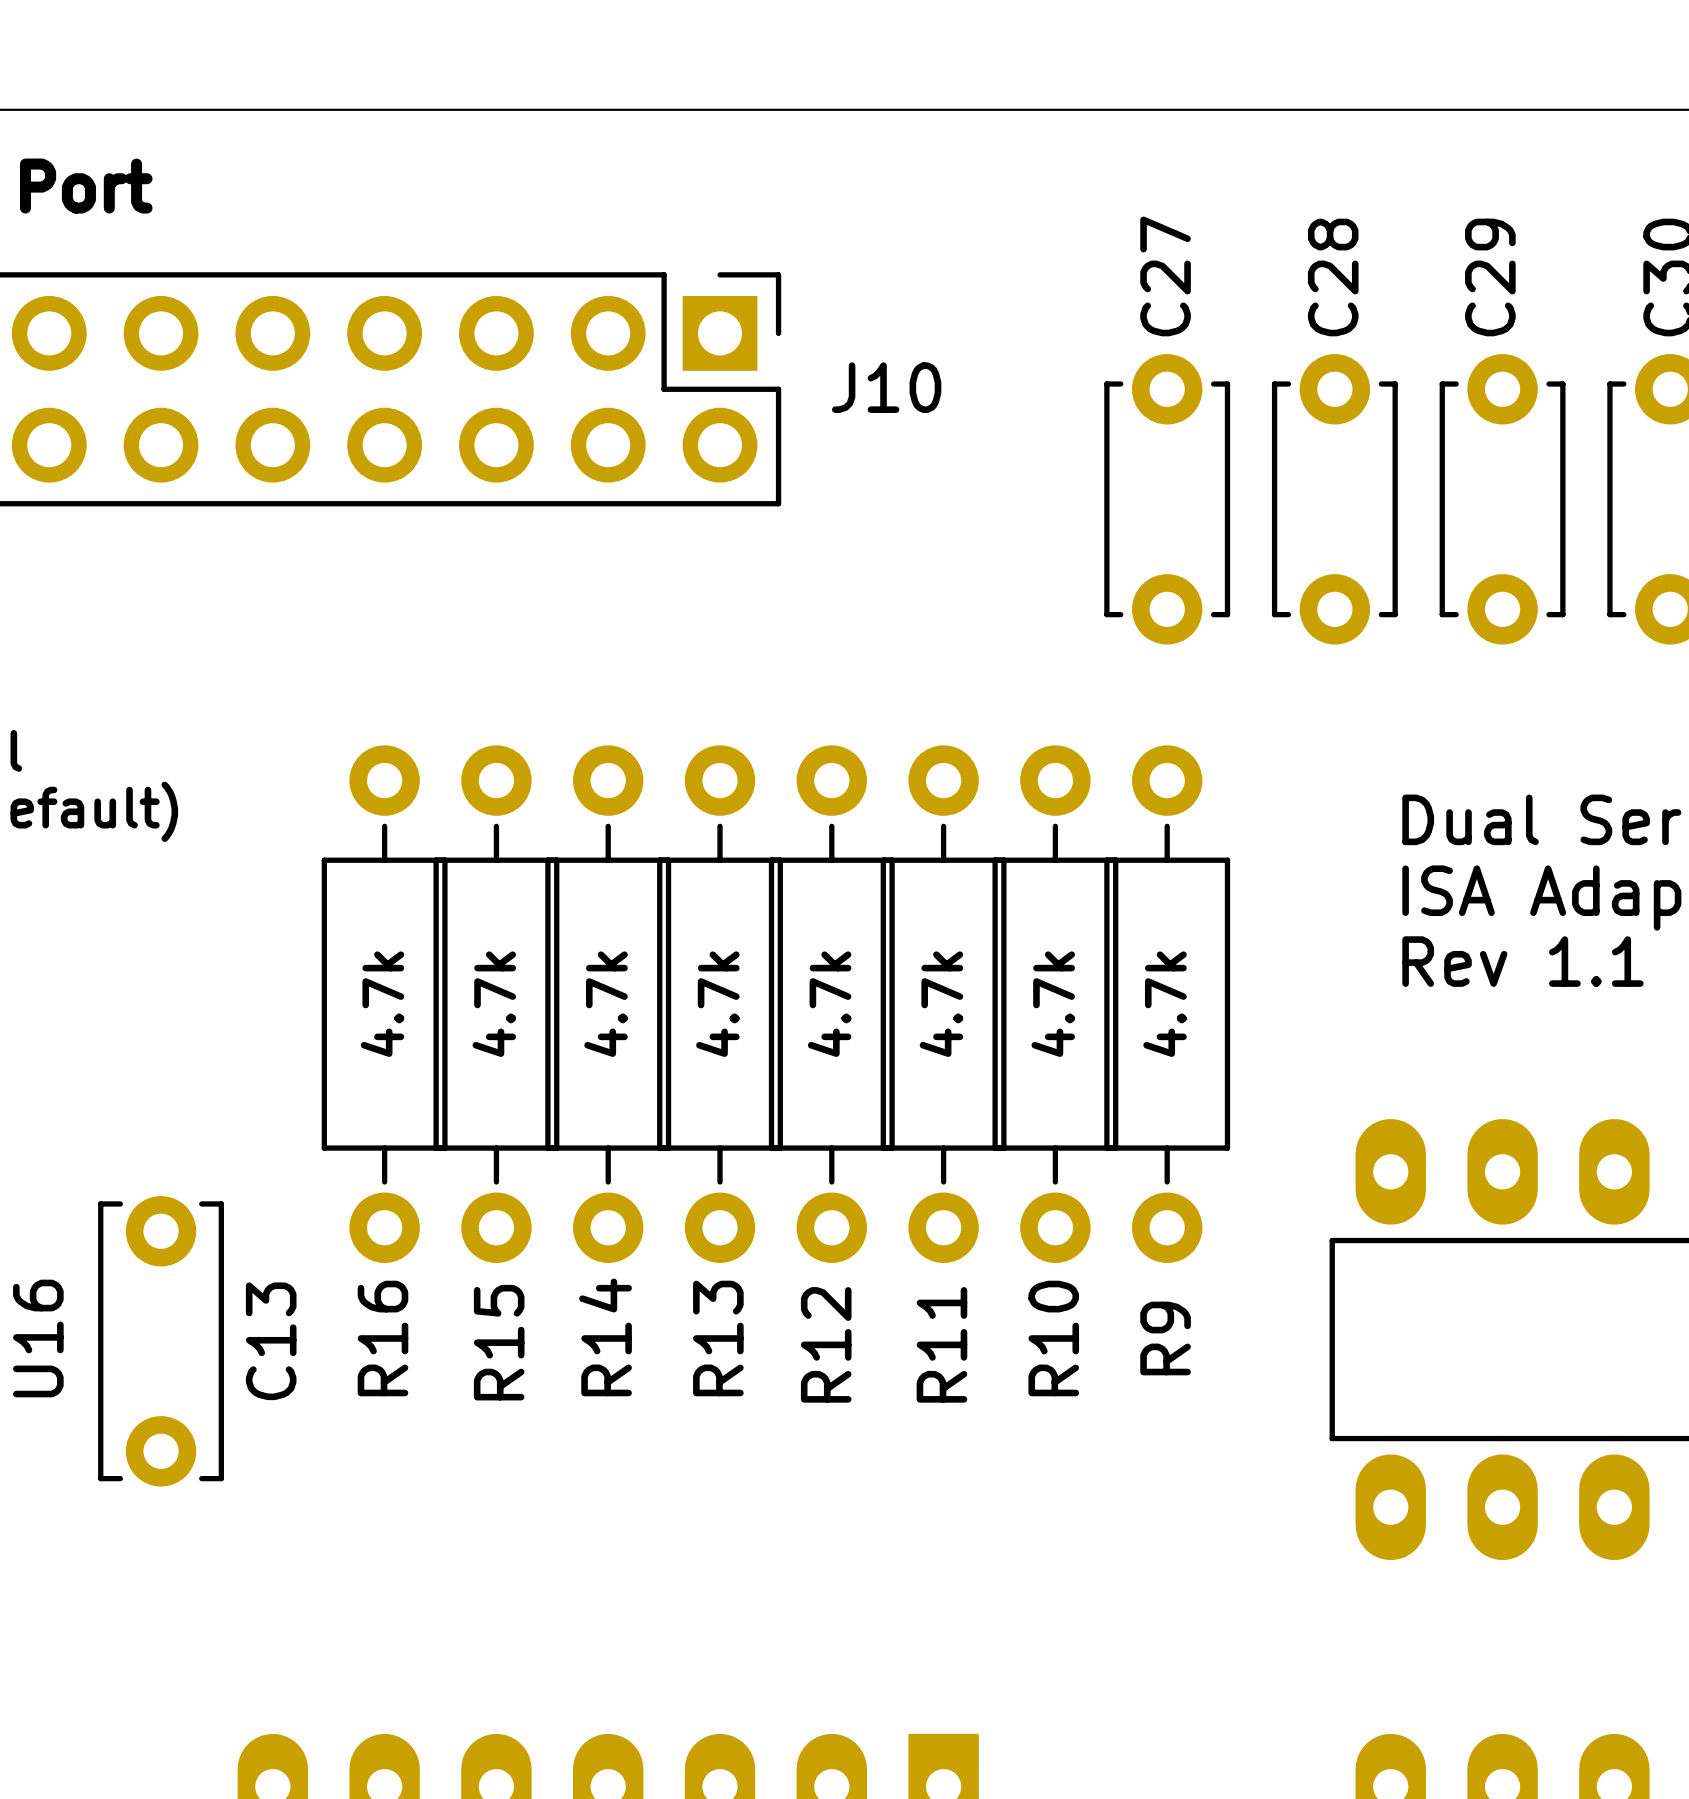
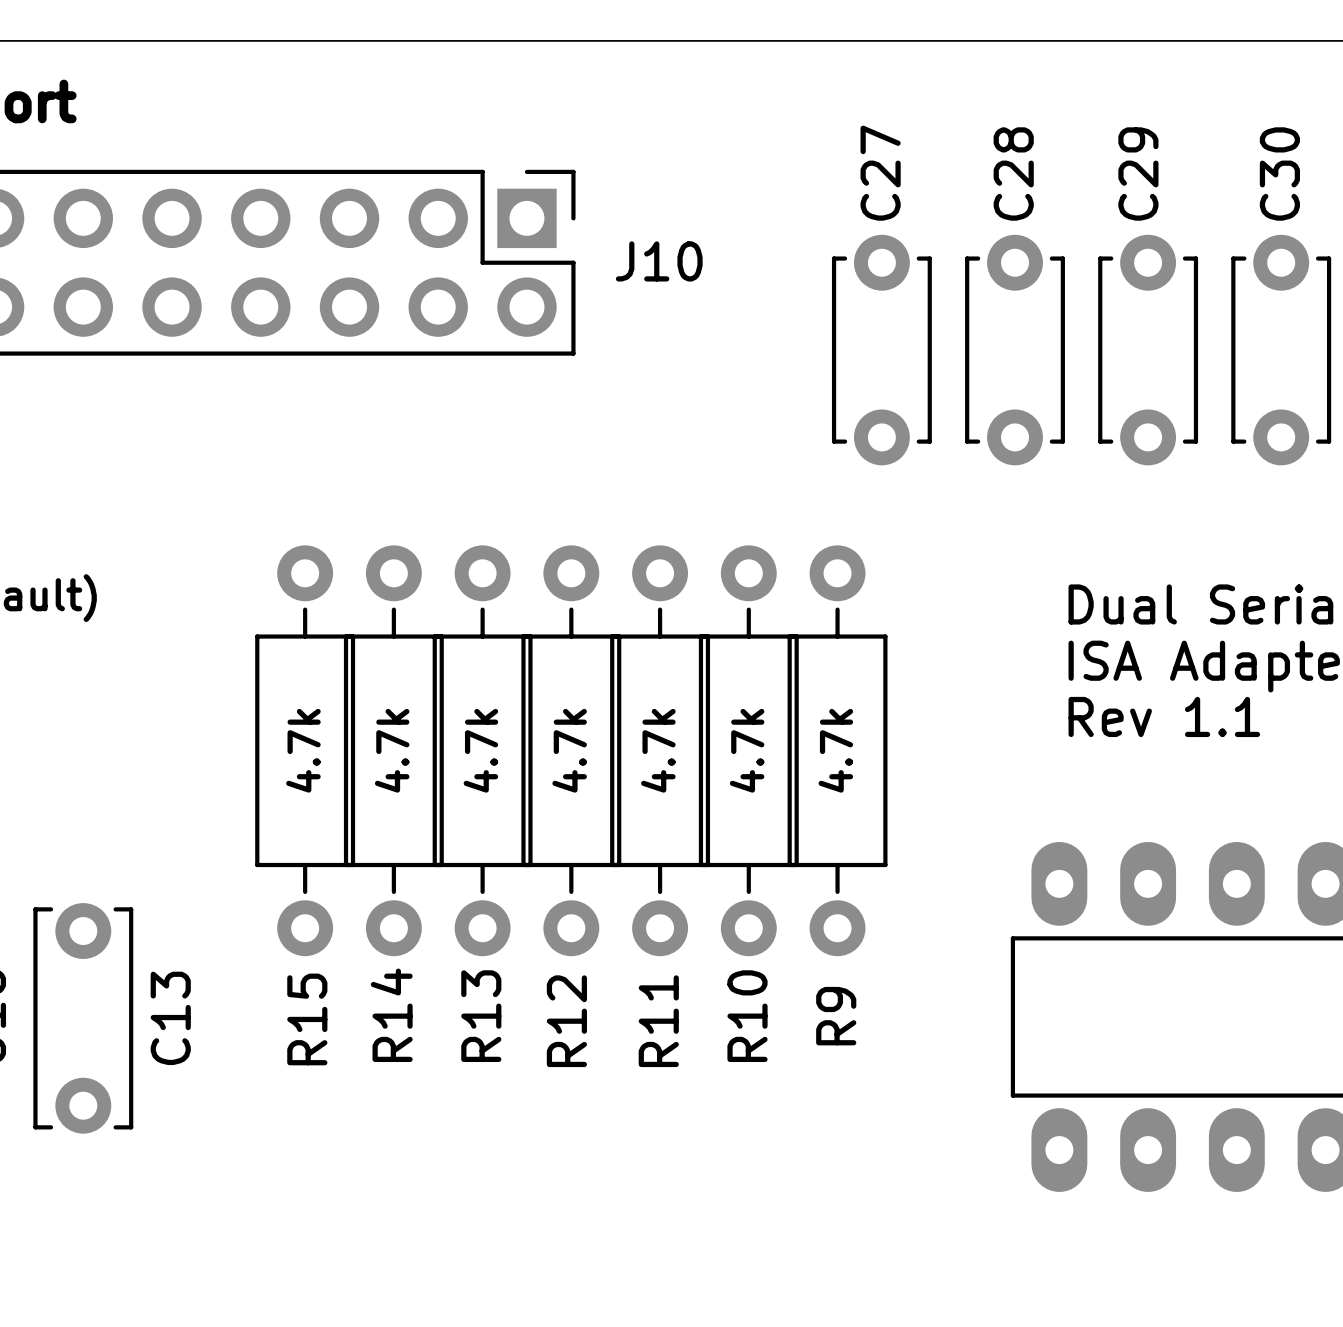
text: 4.7k (382, 1004) -> none
R16: (384, 1004) -> none
text: none -> 4.7k (303, 750)
text: 4.7k (494, 1004) -> none
R15 position: (496, 1004) -> (305, 750)
text: none -> 4.7k (392, 750)
text: 4.7k (606, 1004) -> none
R14 position: (608, 1004) -> (393, 750)
text: none -> 4.7k (480, 750)
text: 4.7k (717, 1004) -> none
R13 position: (720, 1004) -> (482, 750)
text: none -> 4.7k (569, 750)
text: 4.7k (829, 1004) -> none
R12 position: (831, 1004) -> (571, 750)
text: none -> 4.7k (658, 750)
text: 4.7k (941, 1004) -> none
R11 position: (943, 1004) -> (660, 750)
text: none -> 4.7k (747, 750)
text: 4.7k (1053, 1004) -> none
R10 position: (1055, 1004) -> (748, 750)
text: none -> 4.7k (835, 750)
text: 4.7k (1165, 1004) -> none
R9 position: (1167, 1004) -> (837, 750)

